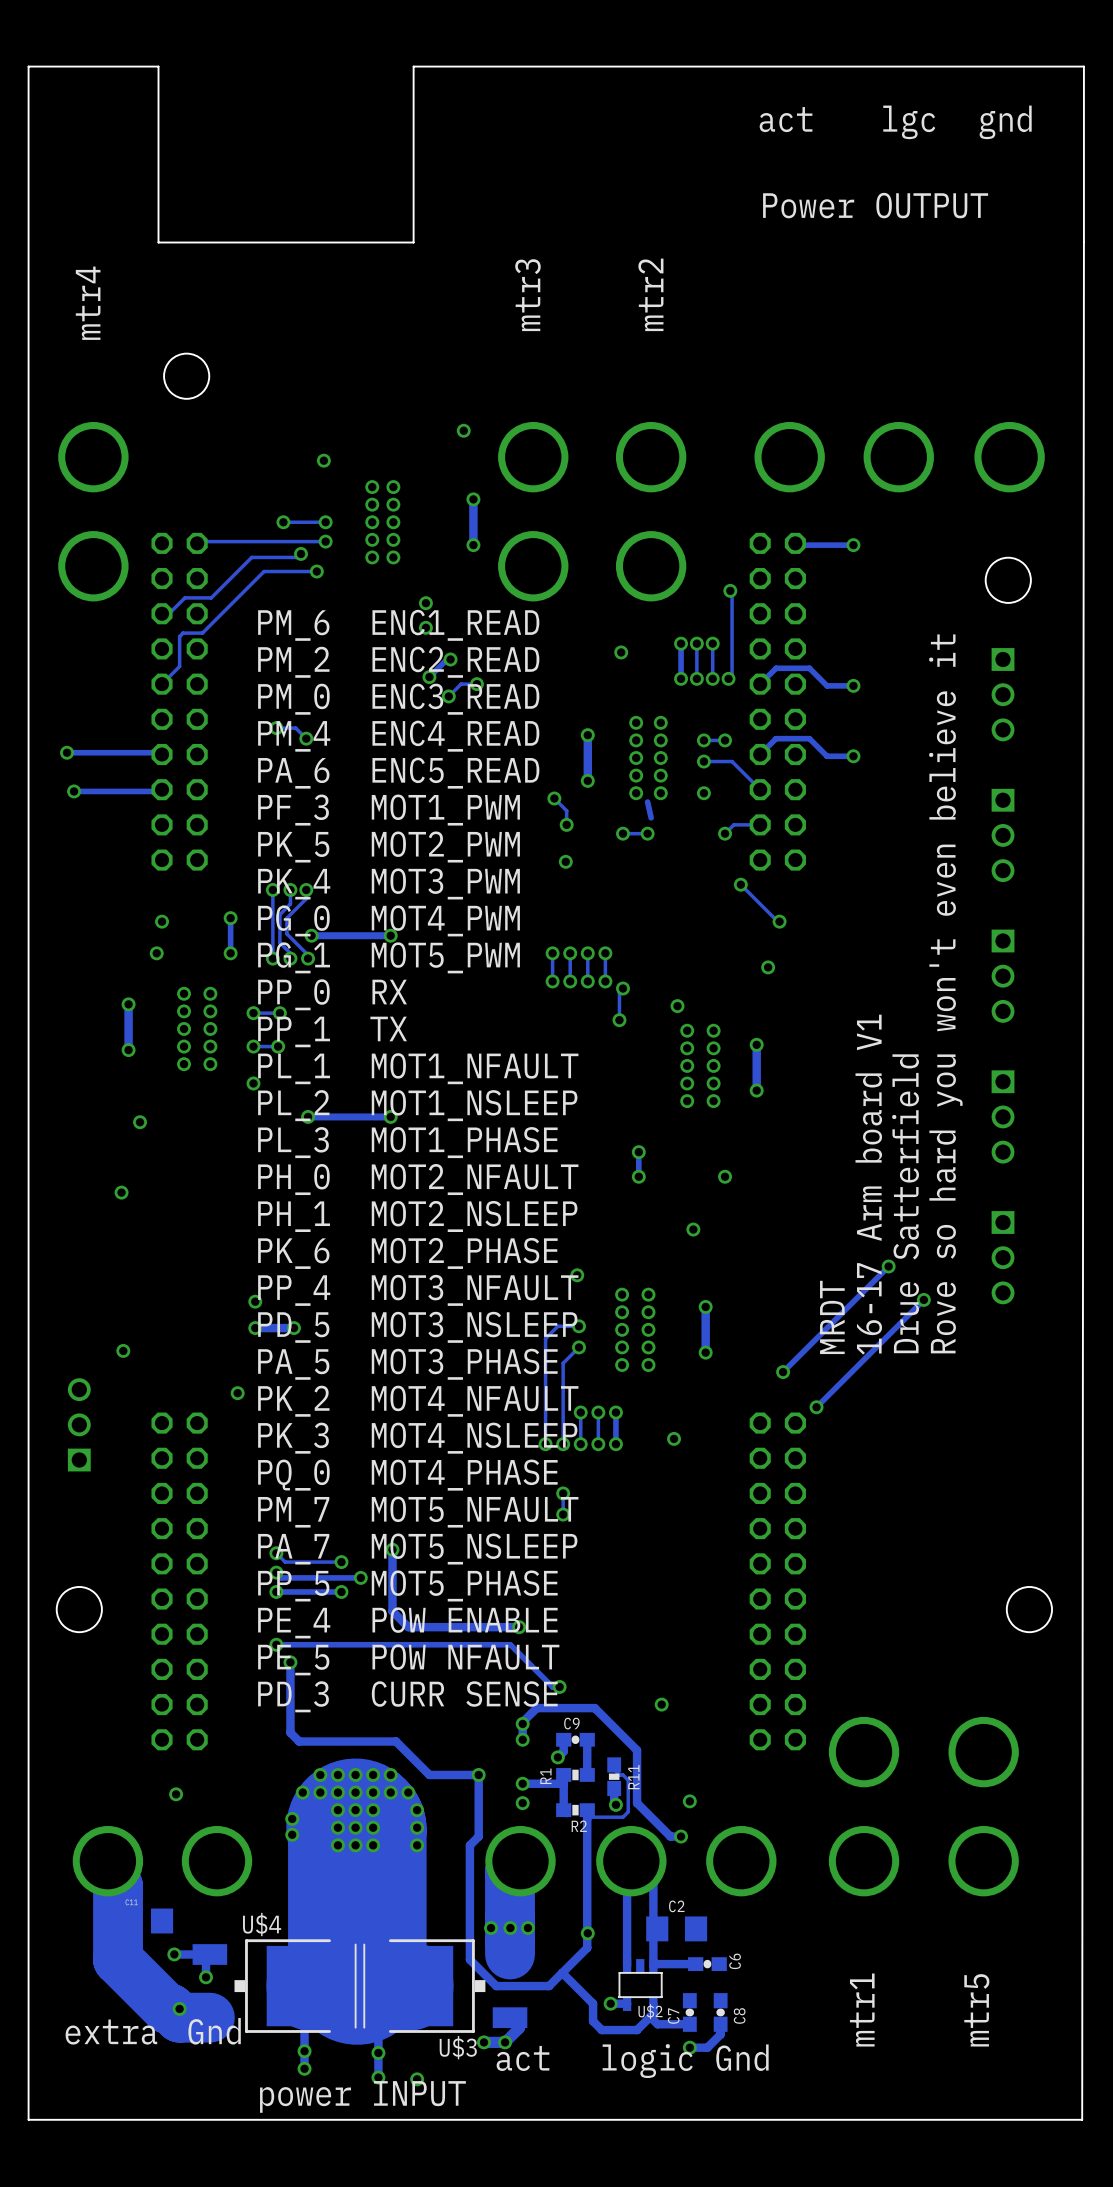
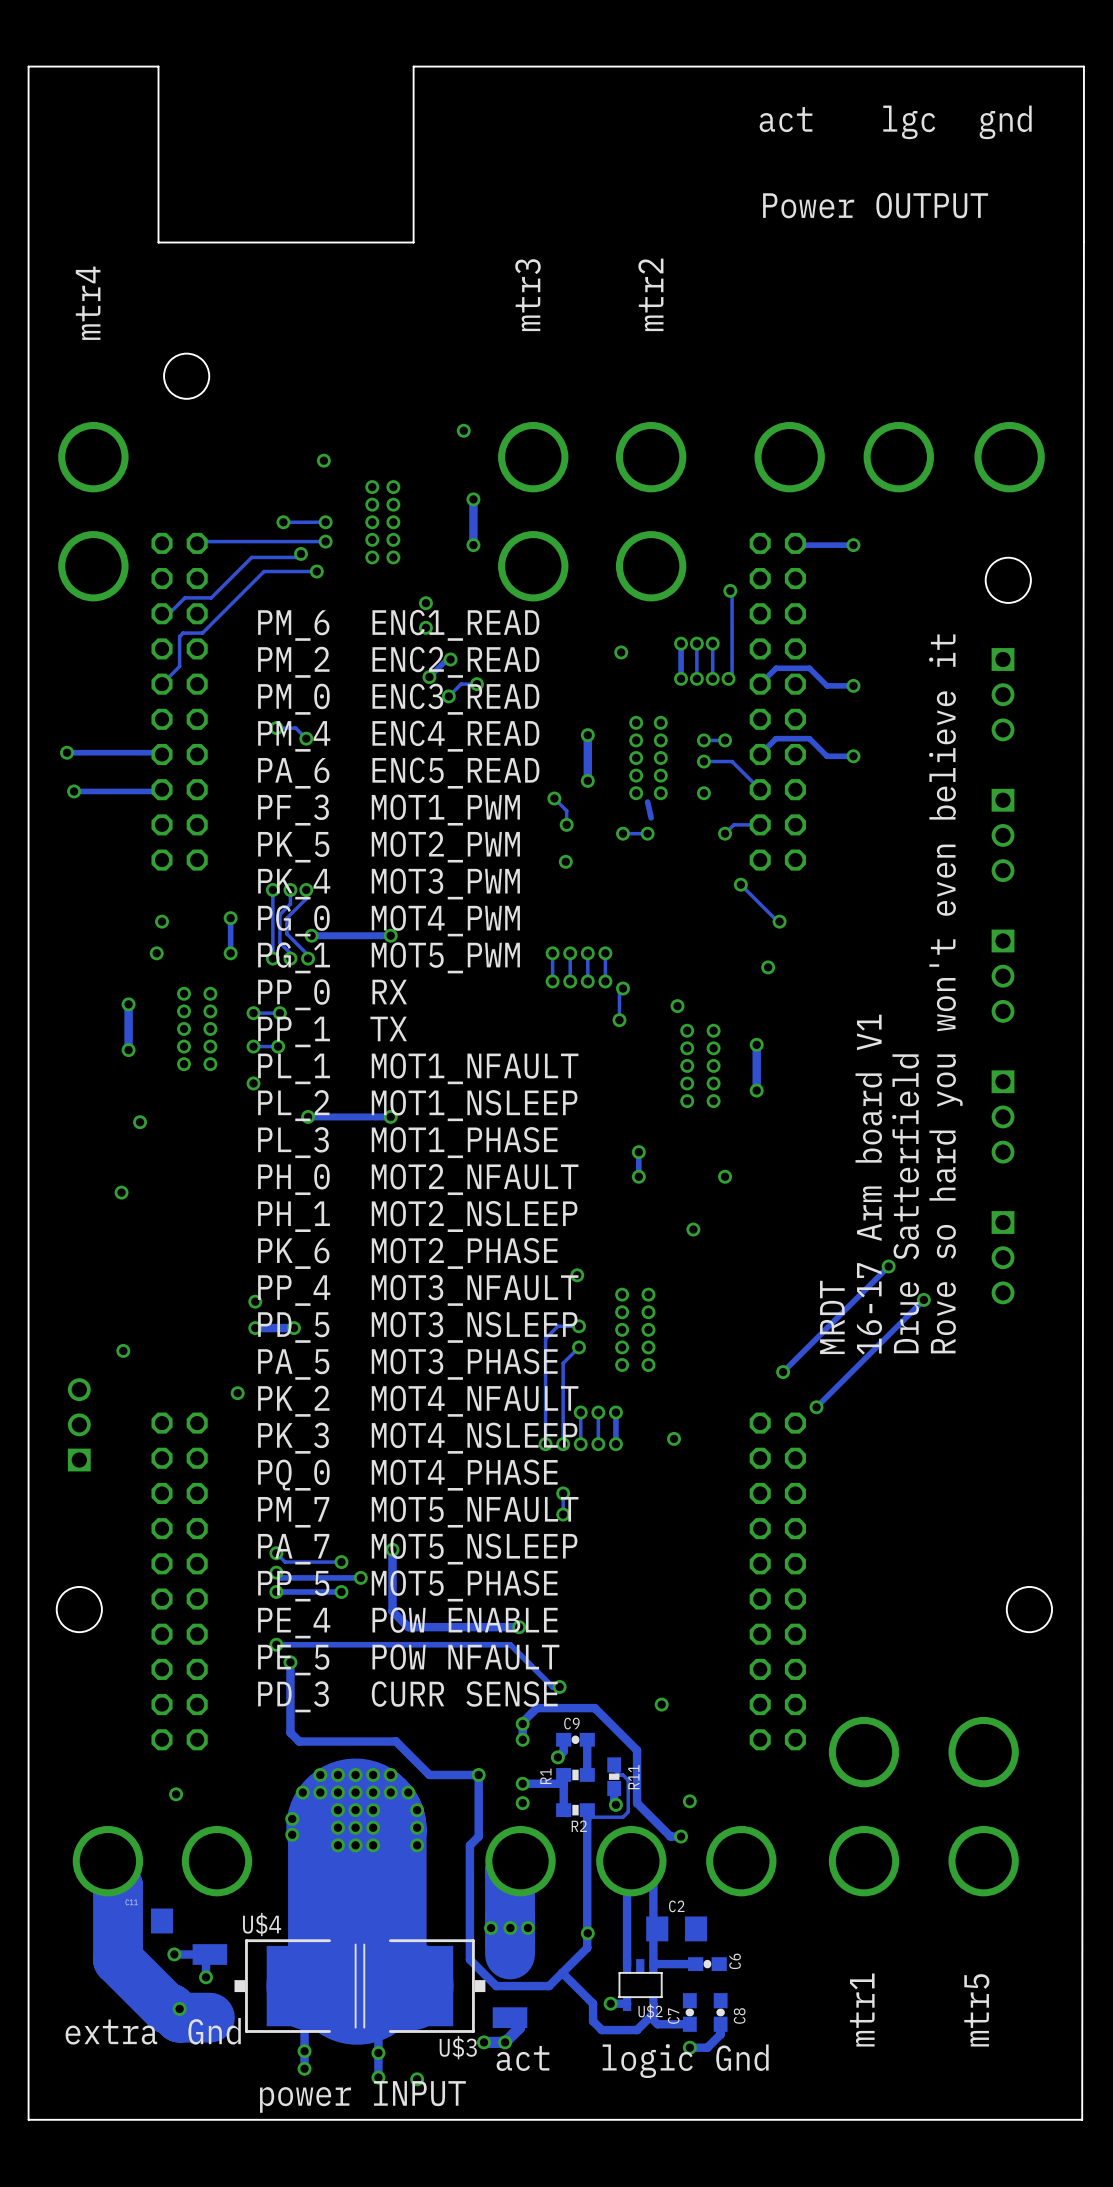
track: (705, 1306) (705, 1352) -> none
via: (705, 1306) -> none
via: (705, 1352) -> none

